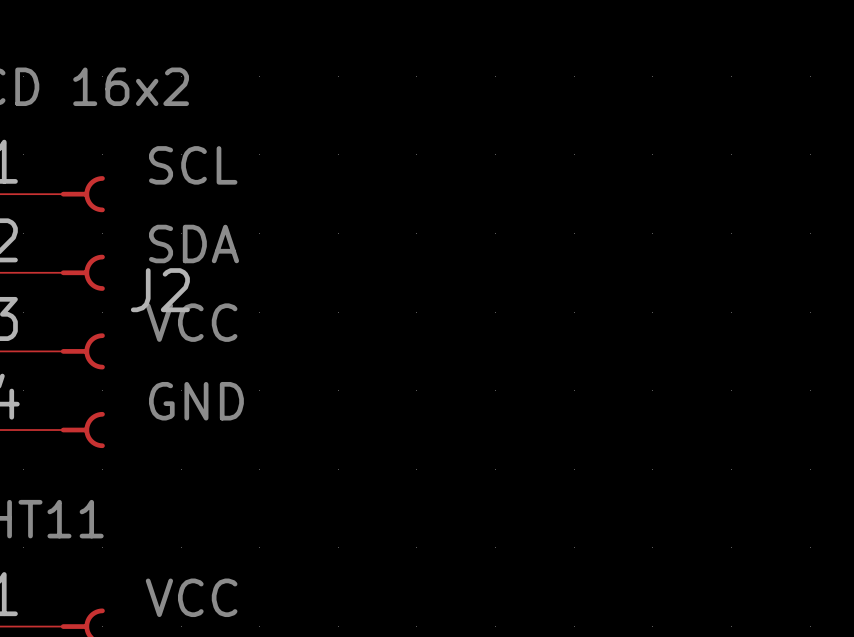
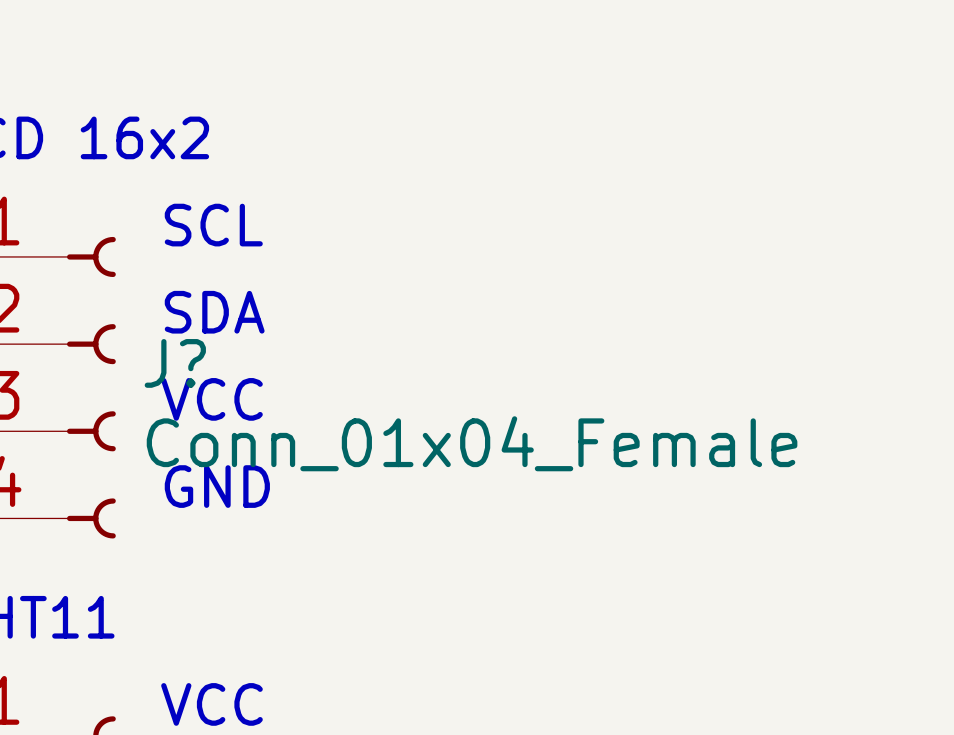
J2 name: J2 (160, 290) -> J? (175, 363)
J2 value: none -> Conn_01x04_Female (472, 443)

